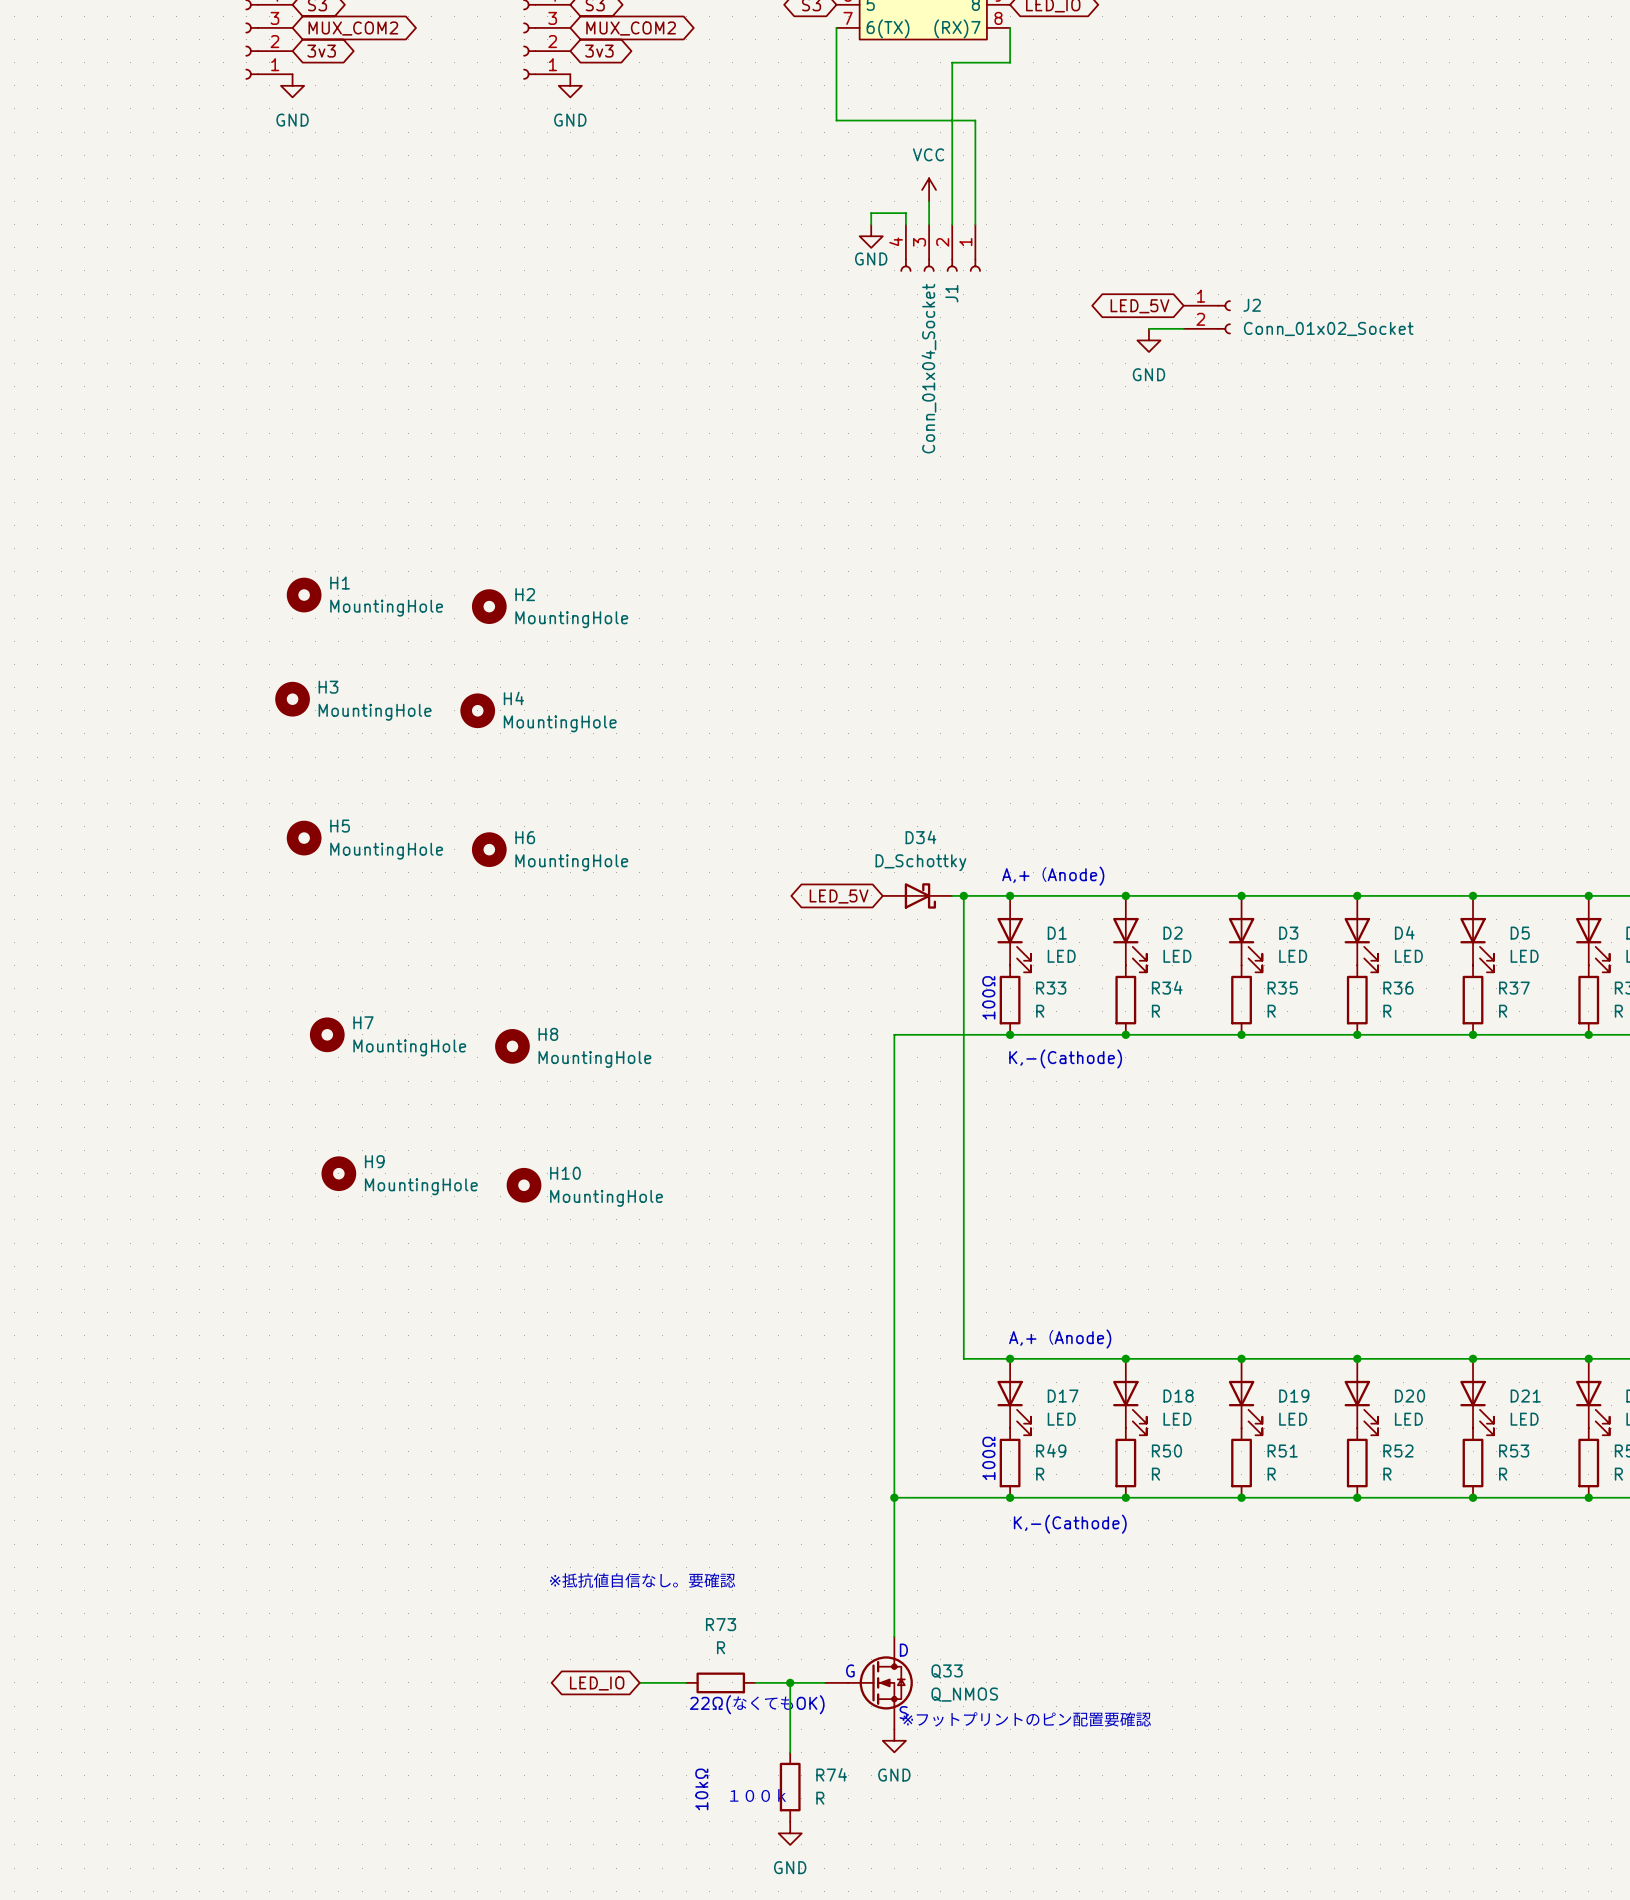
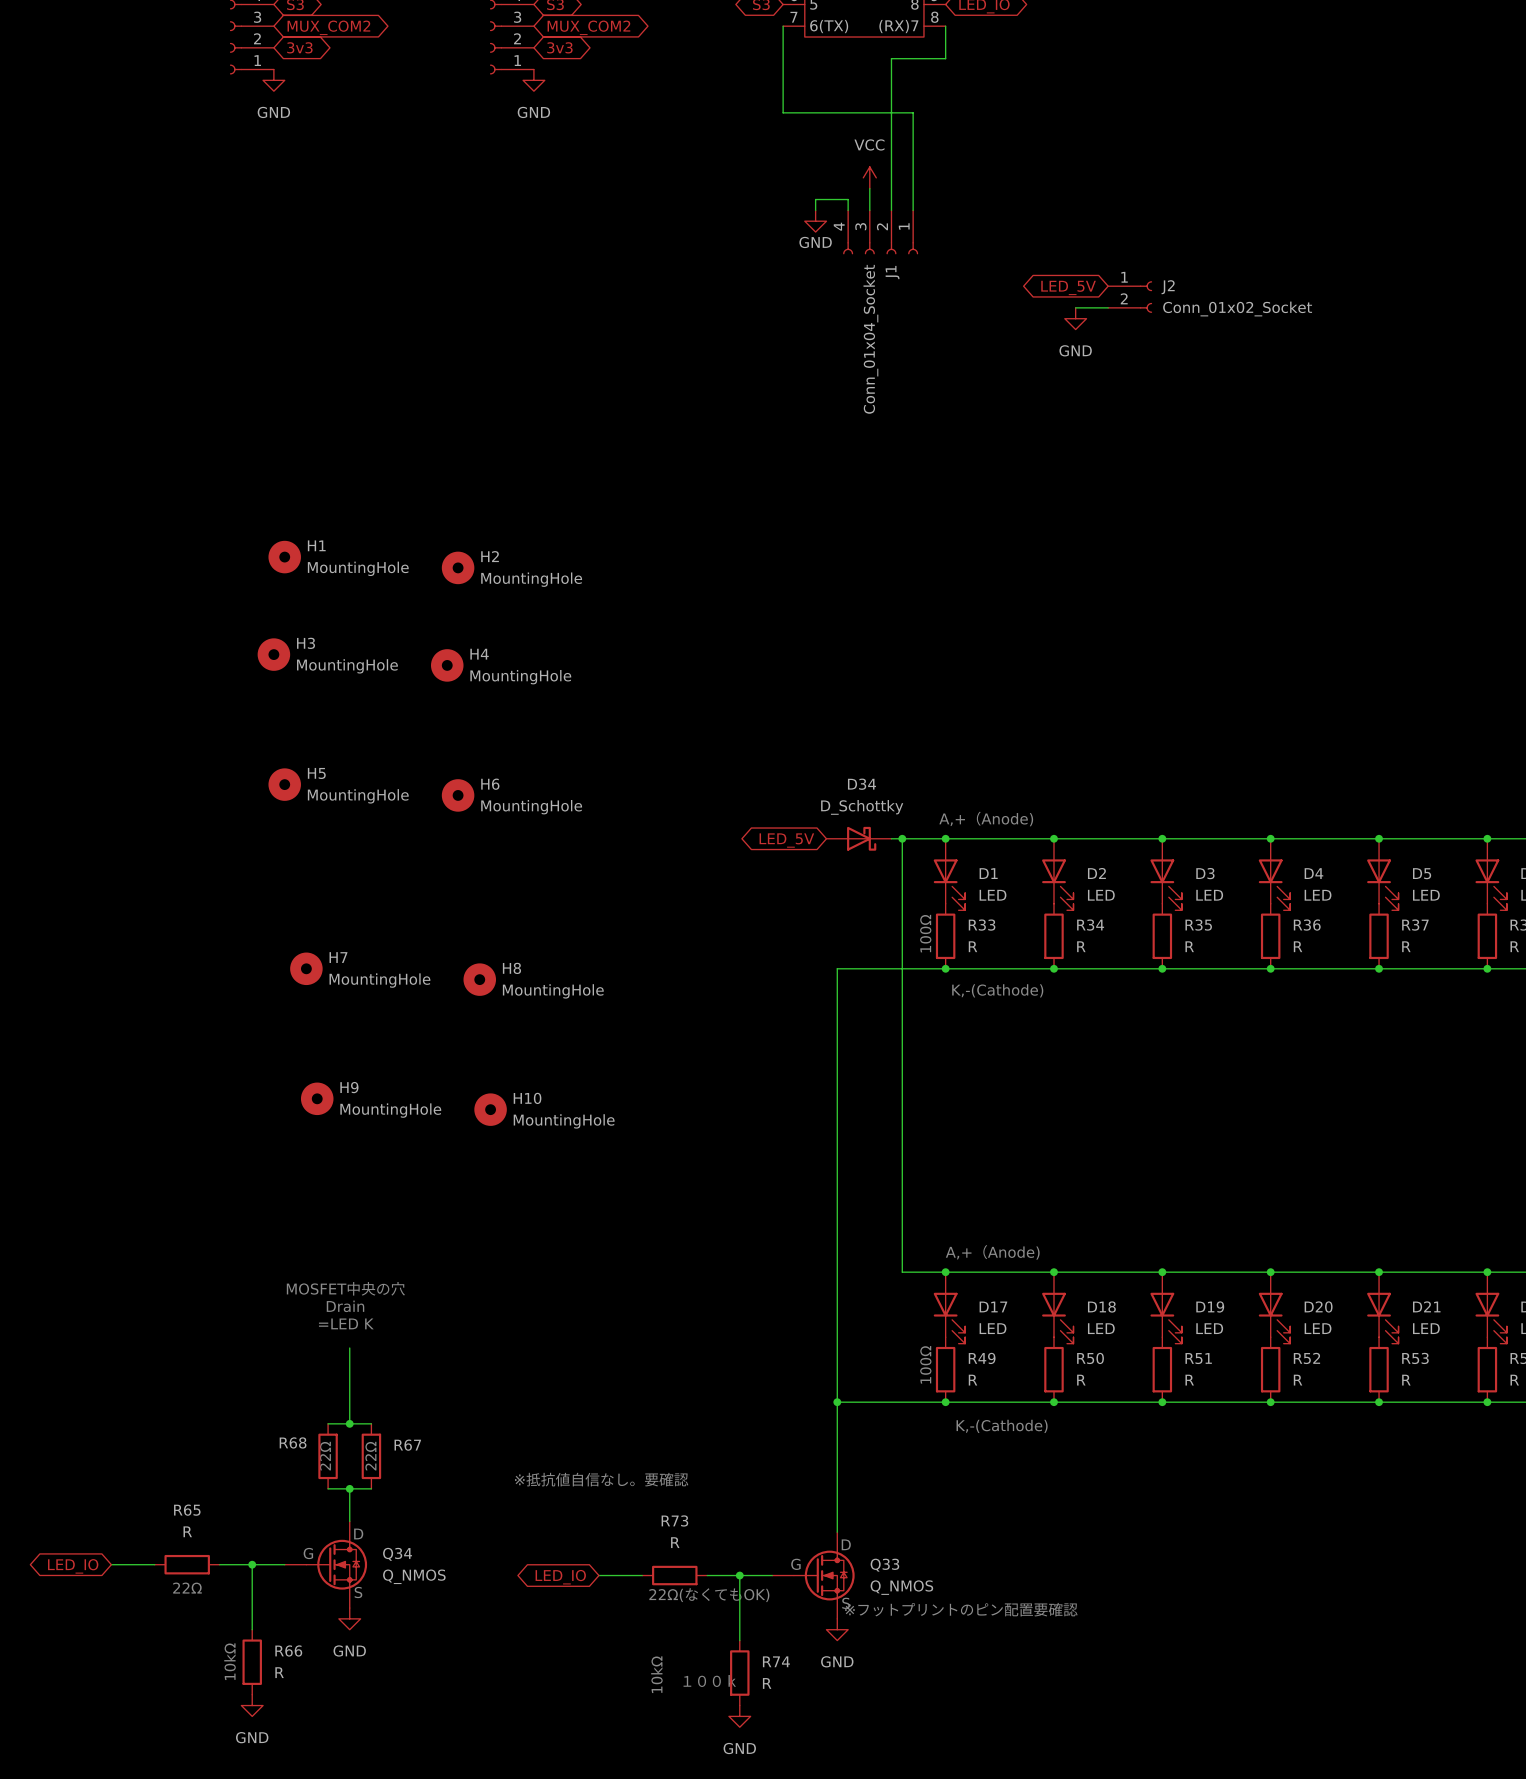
text: none -> MOSFET中央の穴 (345, 1288)
text: none -> Drain (345, 1306)
text: none -> =LED K (346, 1323)
wire: none -> (349, 1348) (349, 1423)
wire: none -> (328, 1423) (371, 1423)
junction: none -> (349, 1423)
text: none -> 22Ω (325, 1456)
R68: none -> (328, 1456)
text: none -> 22Ω (370, 1456)
R67: none -> (371, 1456)
wire: none -> (328, 1488) (371, 1488)
wire: none -> (349, 1488) (349, 1521)
junction: none -> (349, 1488)
text: none -> D (358, 1533)
text: none -> G (308, 1553)
global label: none -> LED_IO (73, 1566)
wire: none -> (111, 1564) (154, 1564)
R65: none -> R (187, 1564)
wire: none -> (219, 1564) (284, 1564)
wire: none -> (252, 1564) (252, 1629)
junction: none -> (252, 1564)
Q34: none -> Q_NMOS (325, 1564)
text: none -> 22Ω (187, 1588)
text: none -> S (358, 1592)
power symbol: none -> GND (349, 1618)
text: none -> 10kΩ (230, 1661)
R66: none -> R (252, 1662)
power symbol: none -> GND (252, 1705)

